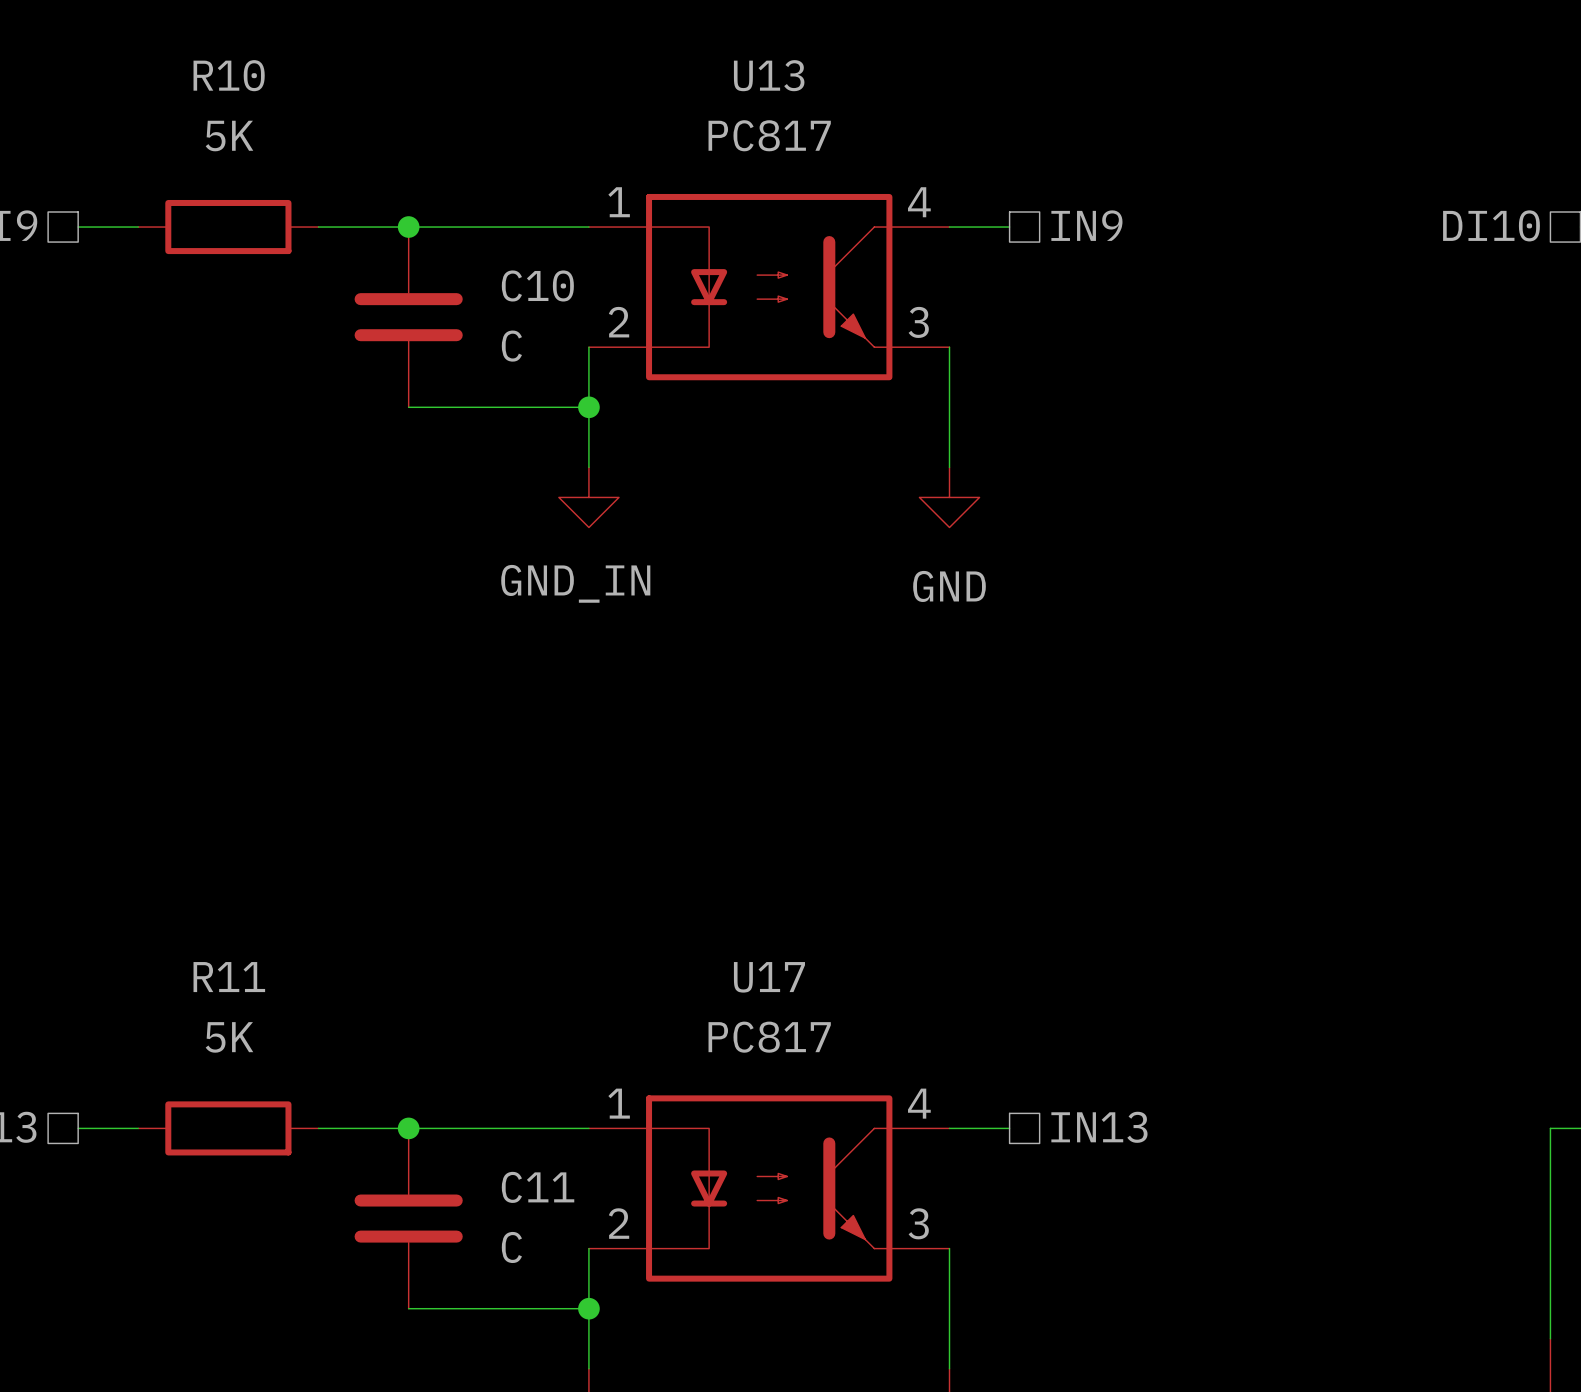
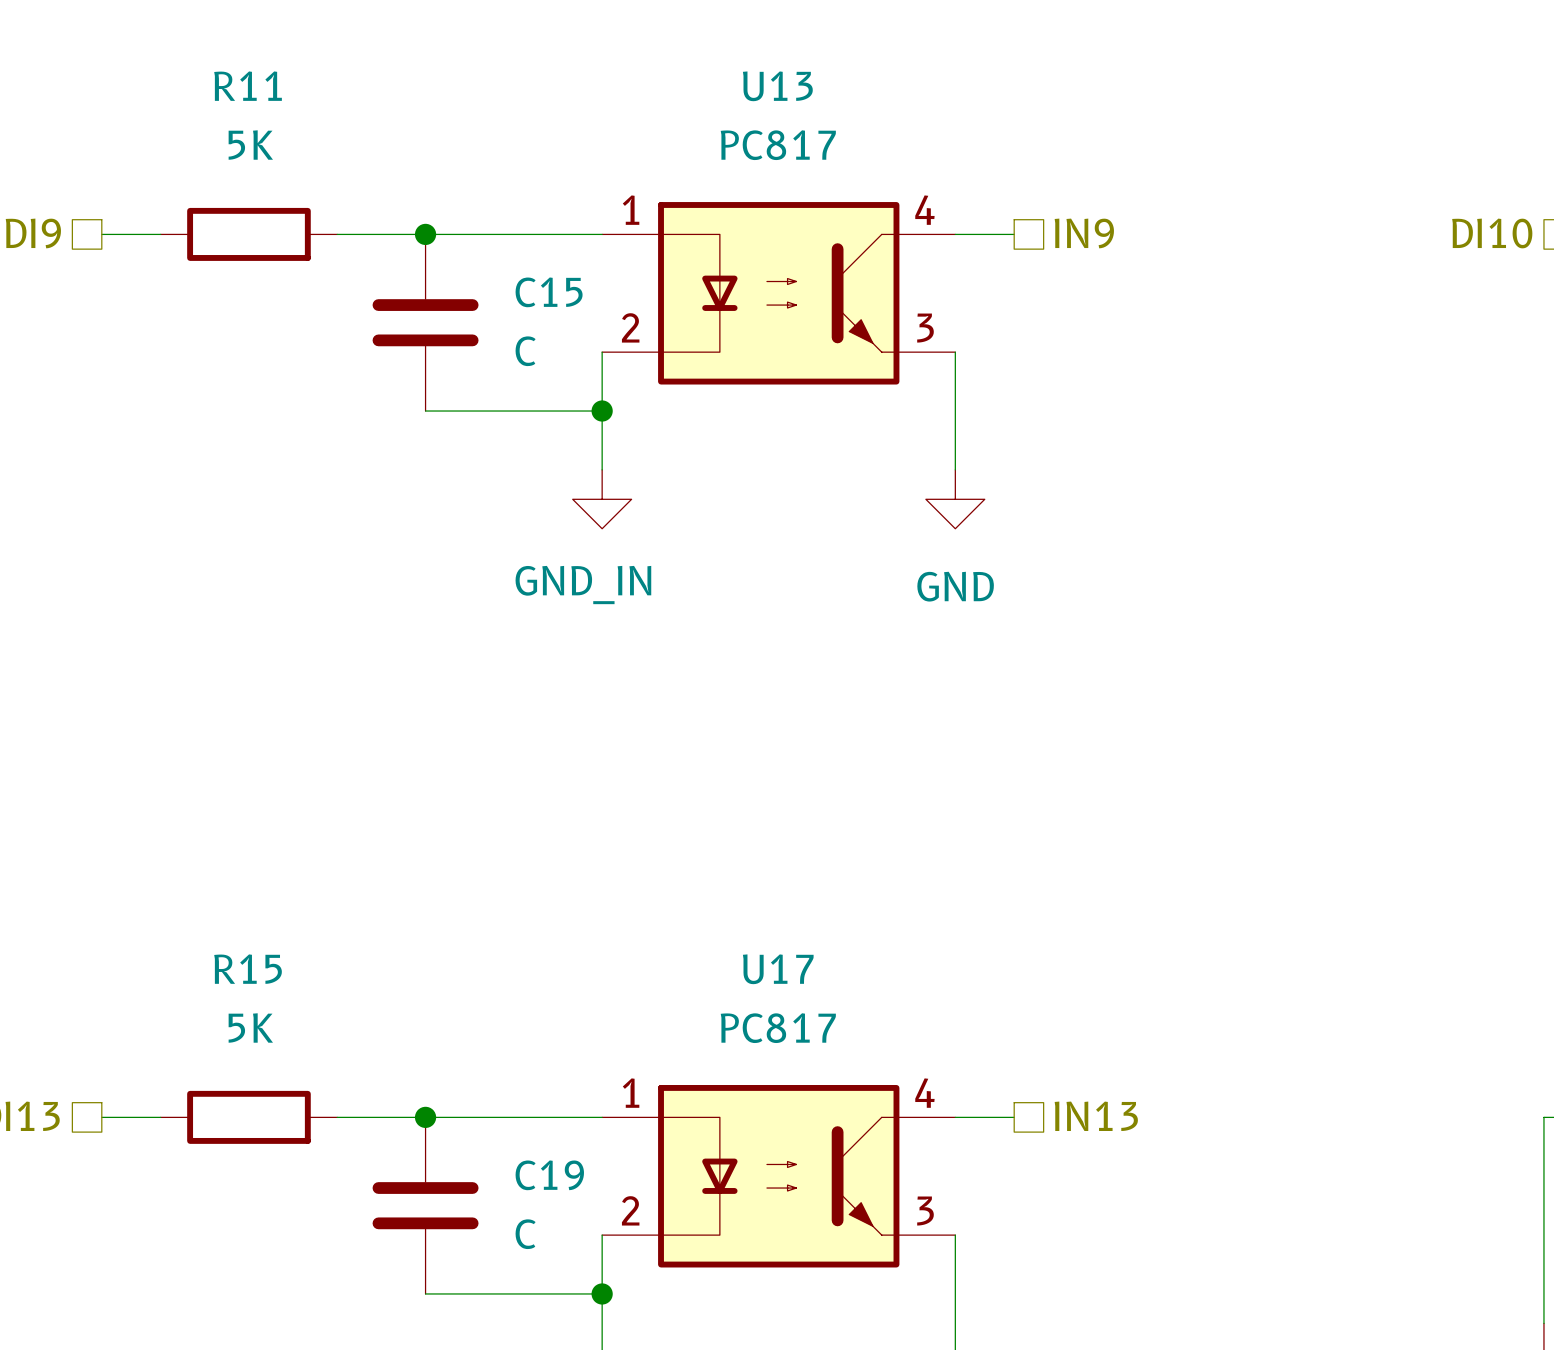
R10 name: R10 (229, 75) -> R11 (248, 86)
C10 name: C10 (537, 285) -> C15 (549, 292)
R11 name: R11 (229, 977) -> R15 (248, 969)
C11 name: C11 (538, 1187) -> C19 (549, 1175)

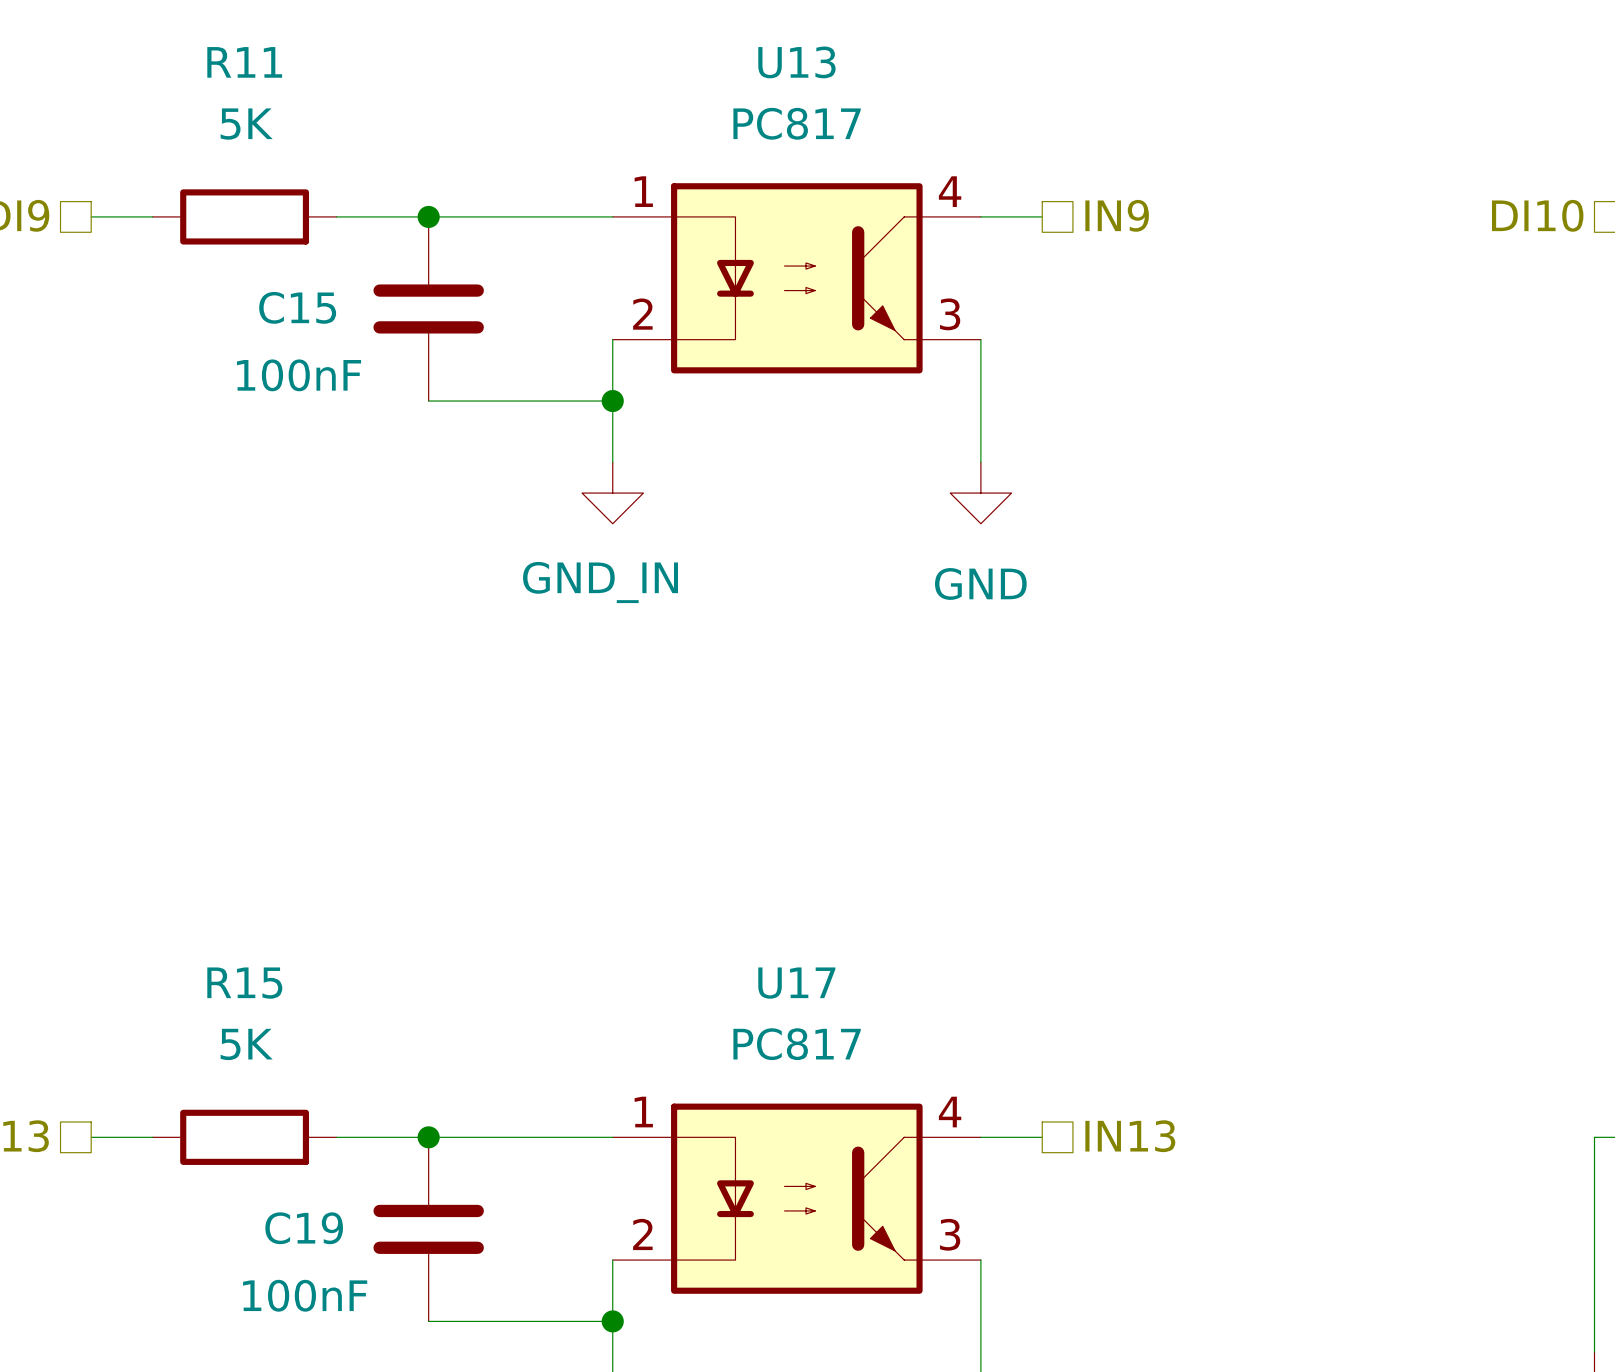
C15 name position: C15 (549, 292) -> C15 (297, 307)
C15 value: C (525, 351) -> 100nF (299, 375)
C19 name position: C19 (549, 1175) -> C19 (304, 1228)
C19 value: C (525, 1234) -> 100nF (305, 1295)

